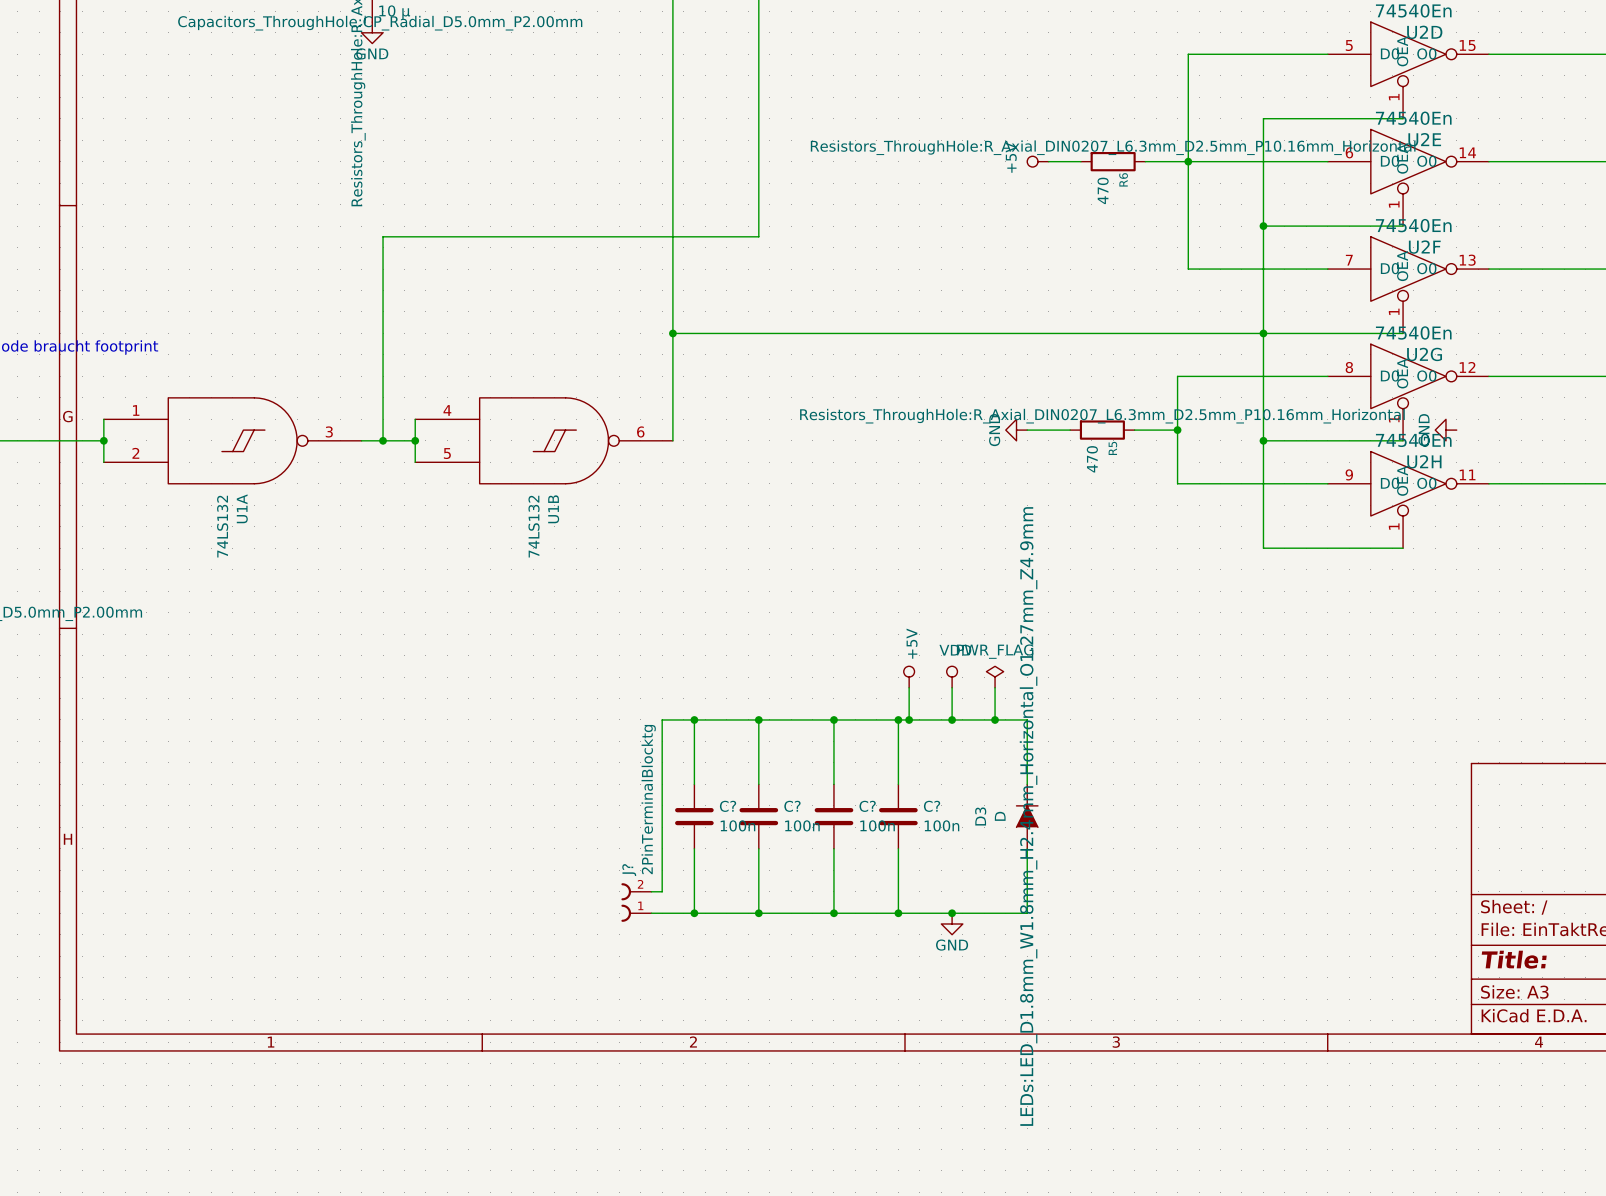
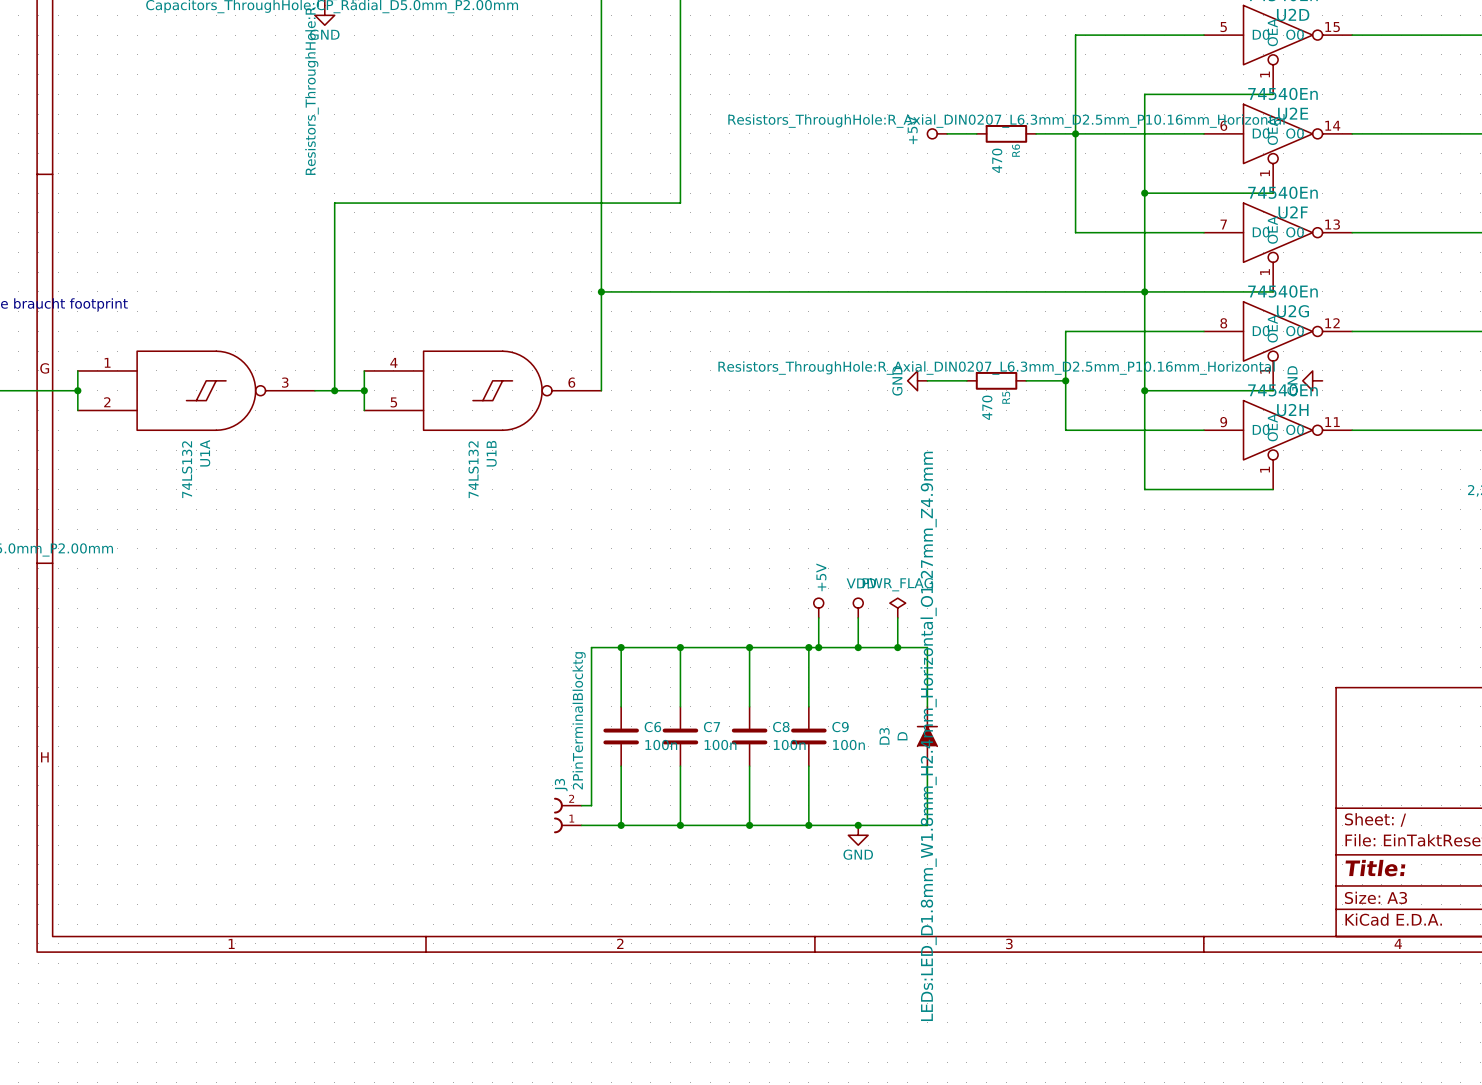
C? name: C? (728, 806) -> C6 (652, 727)
C? name: C? (792, 806) -> C7 (711, 727)
C? name: C? (867, 806) -> C8 (781, 727)
C? name: C? (932, 806) -> C9 (840, 727)
J? name: J? (629, 870) -> J3 (561, 785)

